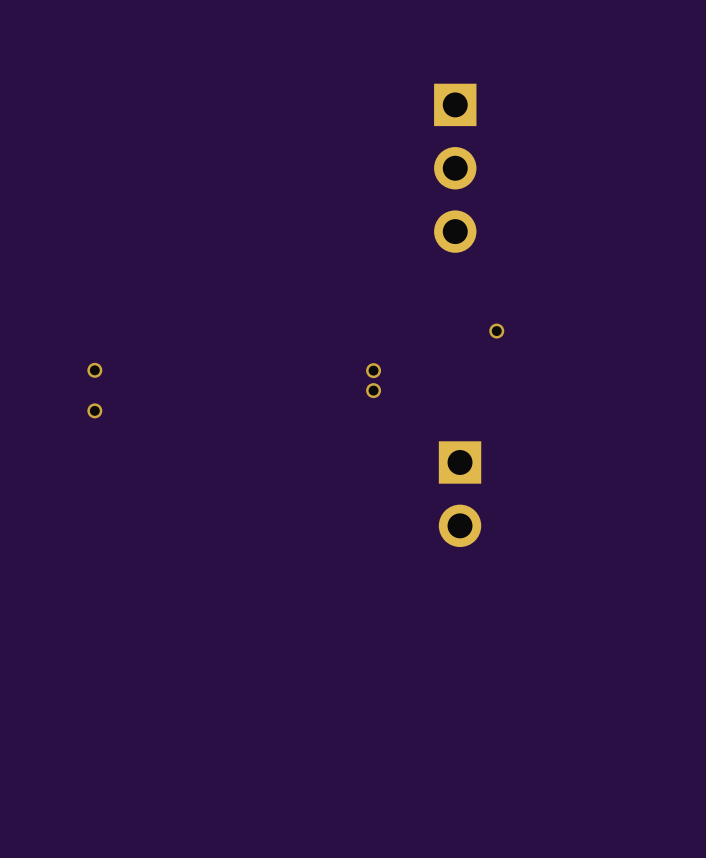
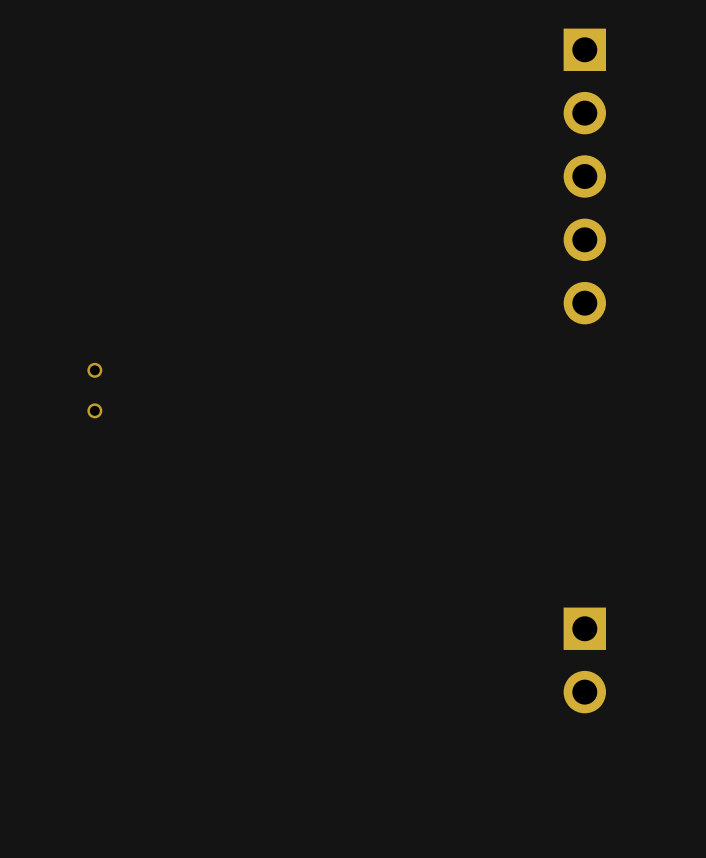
part: (455, 168) -> none
part: none -> (584, 176)
via: (496, 331) -> none
via: (373, 370) -> none
via: (373, 390) -> none
part position: (460, 494) -> (584, 660)

